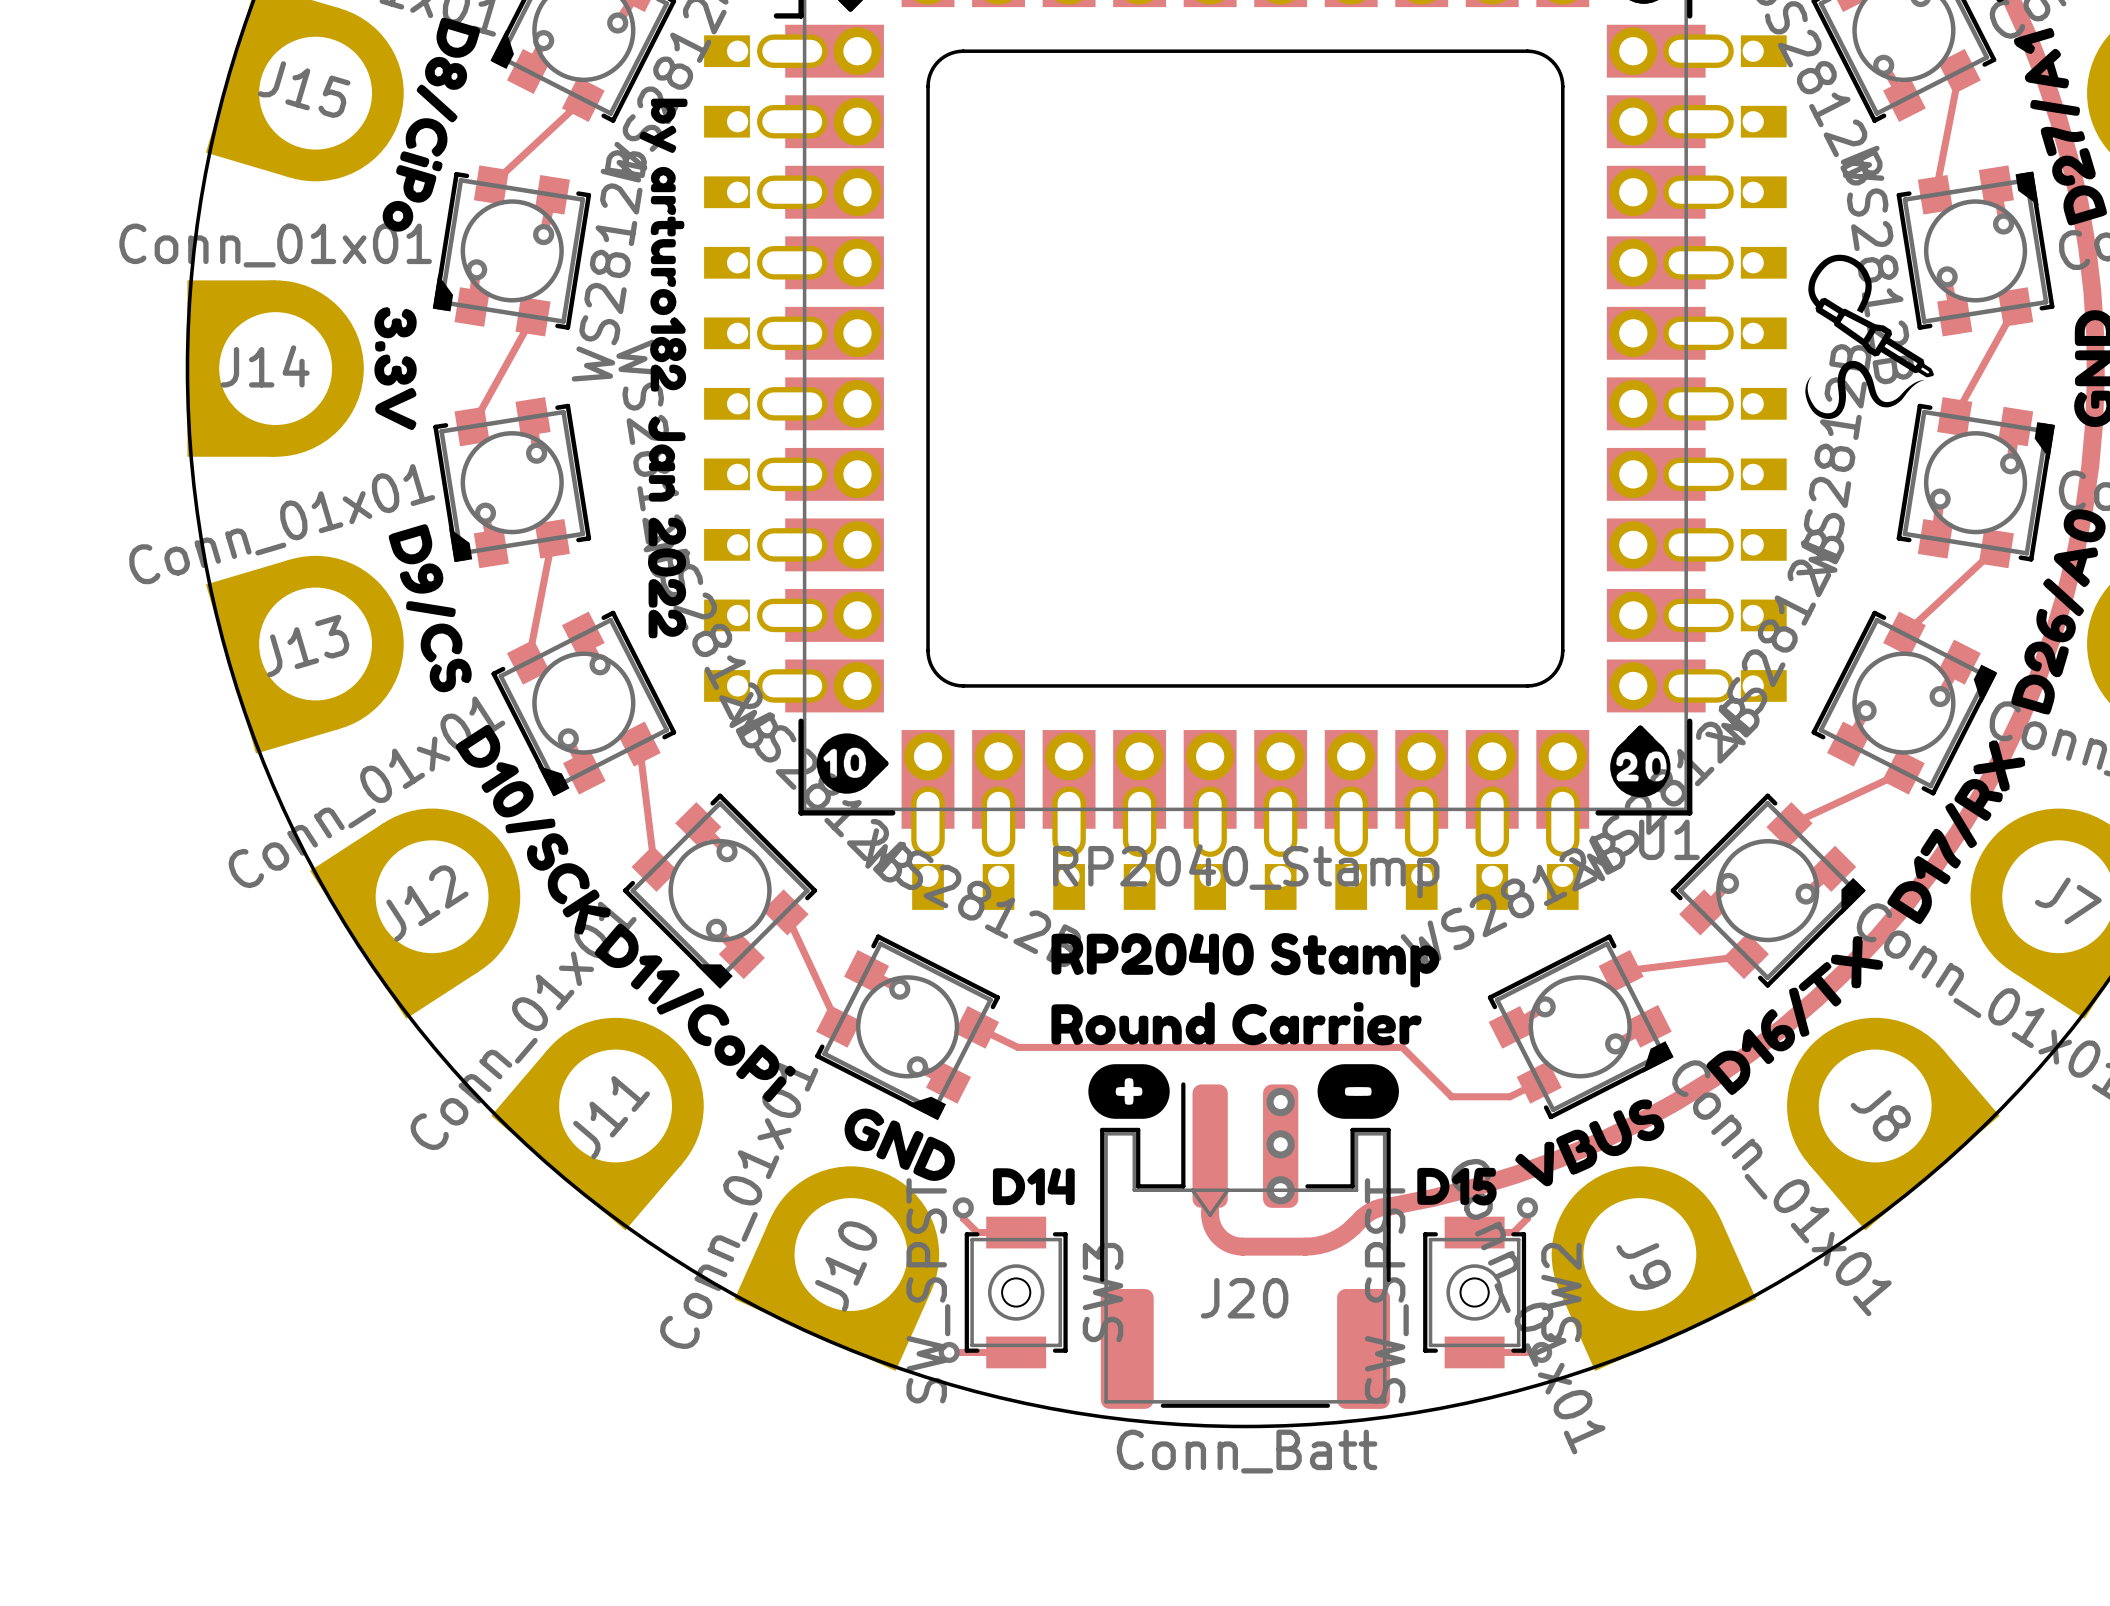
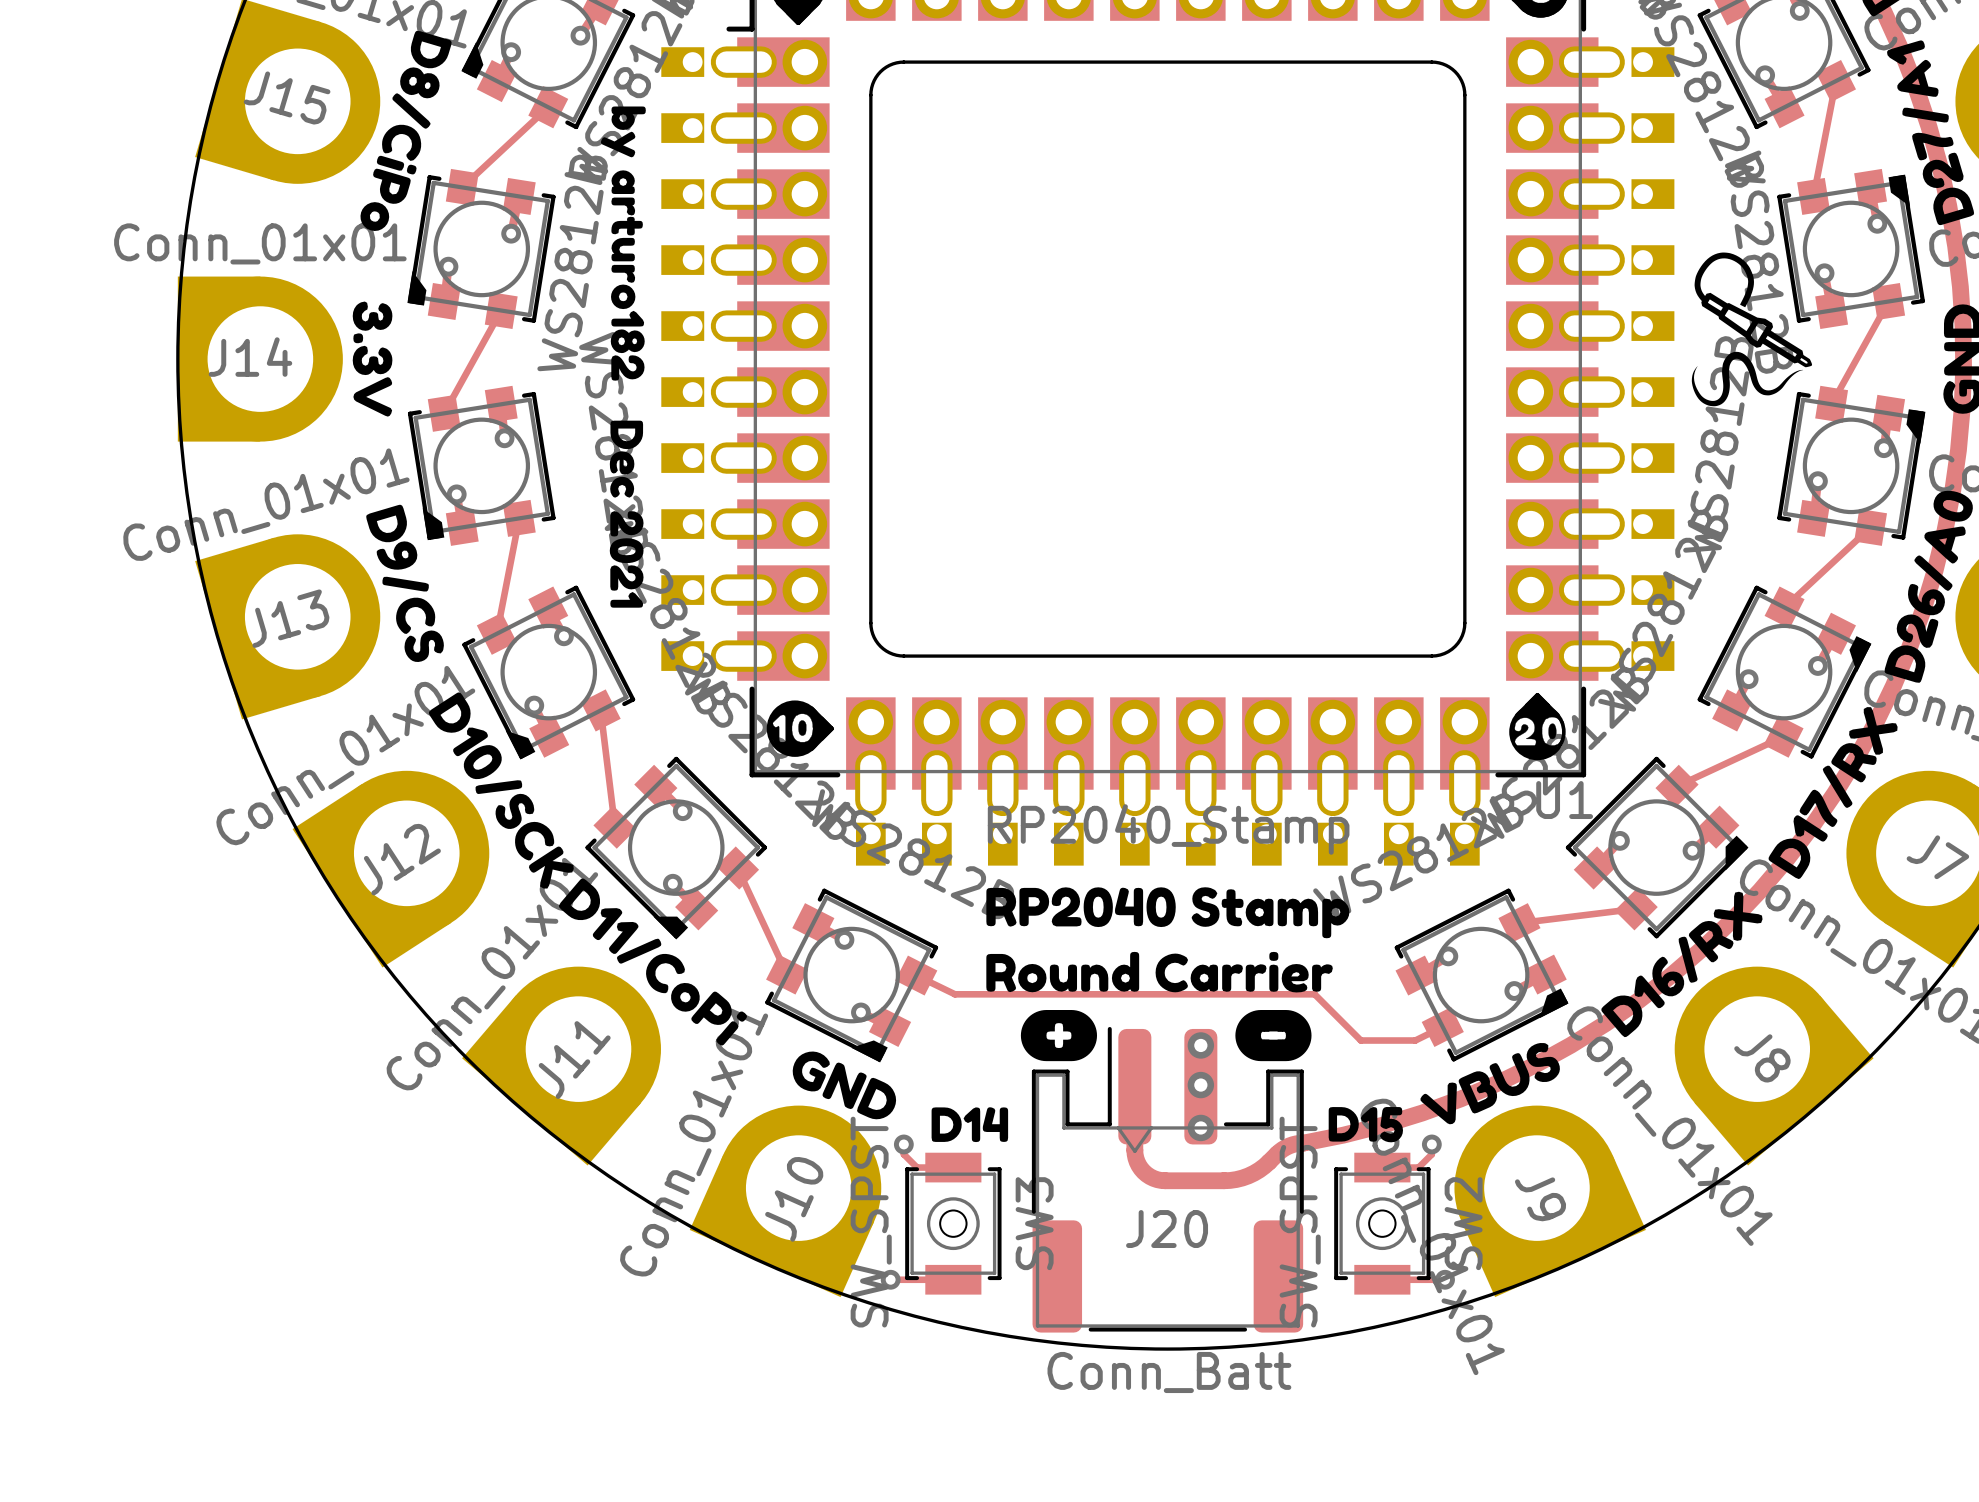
drawing shape: [647, 416, 687, 639] -> [609, 420, 644, 608]
drawing shape: [1706, 936, 1884, 1095] -> [1601, 891, 1763, 1038]

